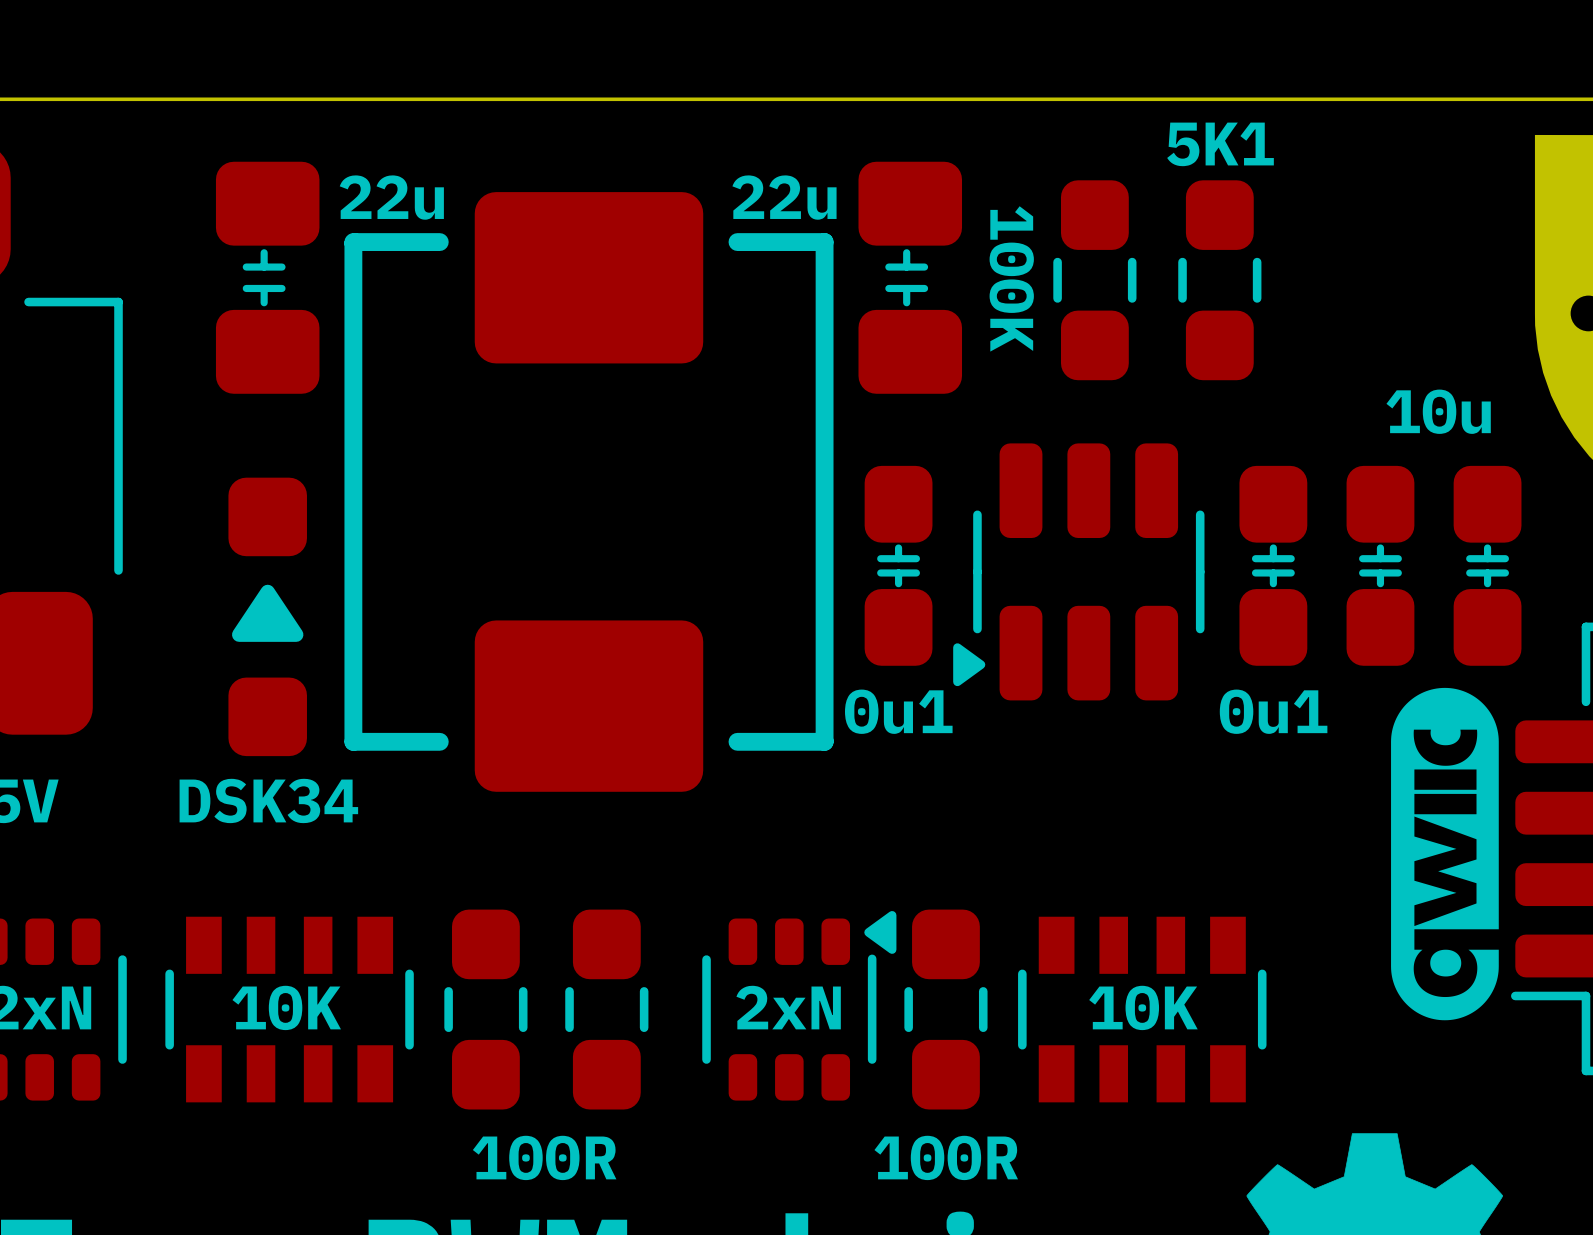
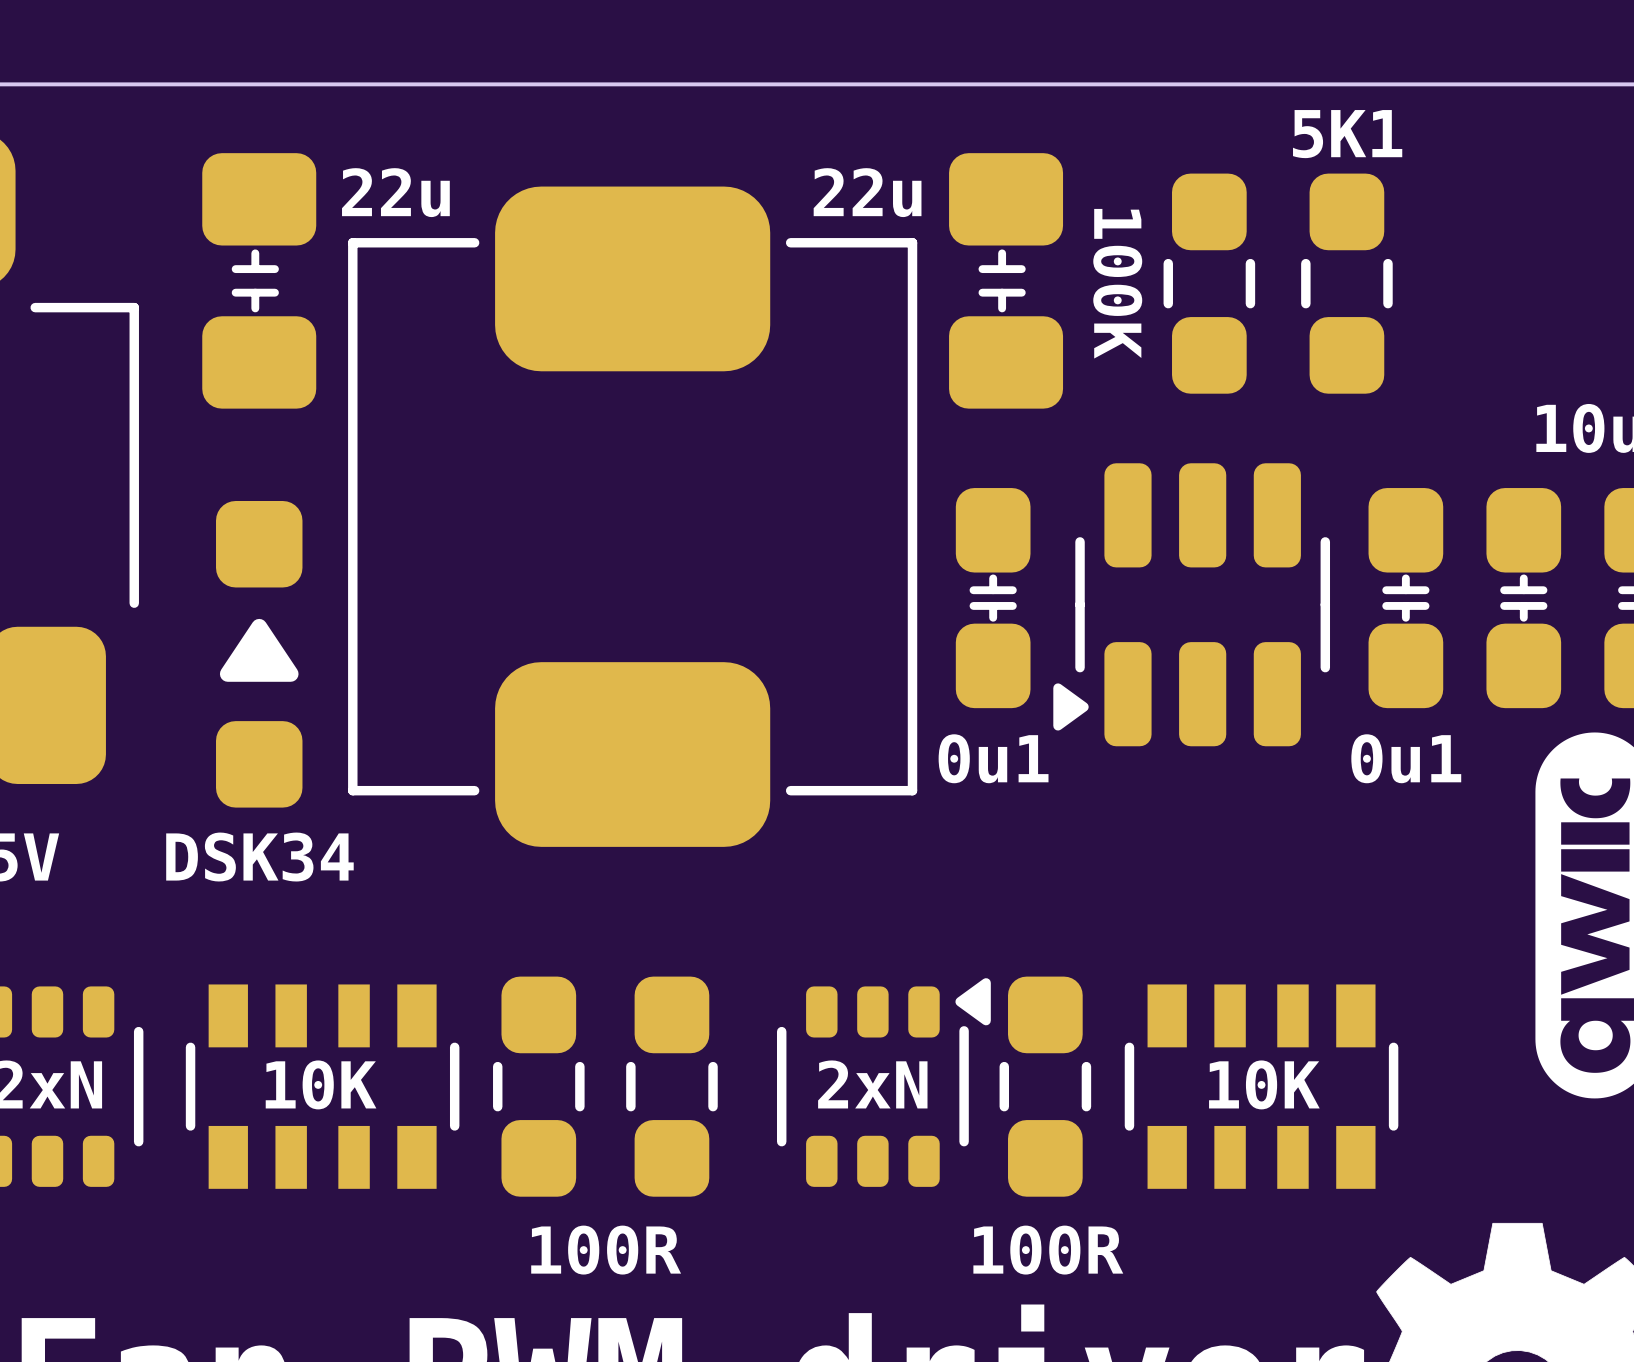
part footprint: [344, 192, 834, 792] -> [348, 186, 918, 847]
text position: 22u (391, 197) -> 22u (395, 192)
part position: (267, 277) -> (259, 280)
part position: (267, 616) -> (259, 654)
text position: DSK34 (268, 800) -> DSK34 (259, 857)

